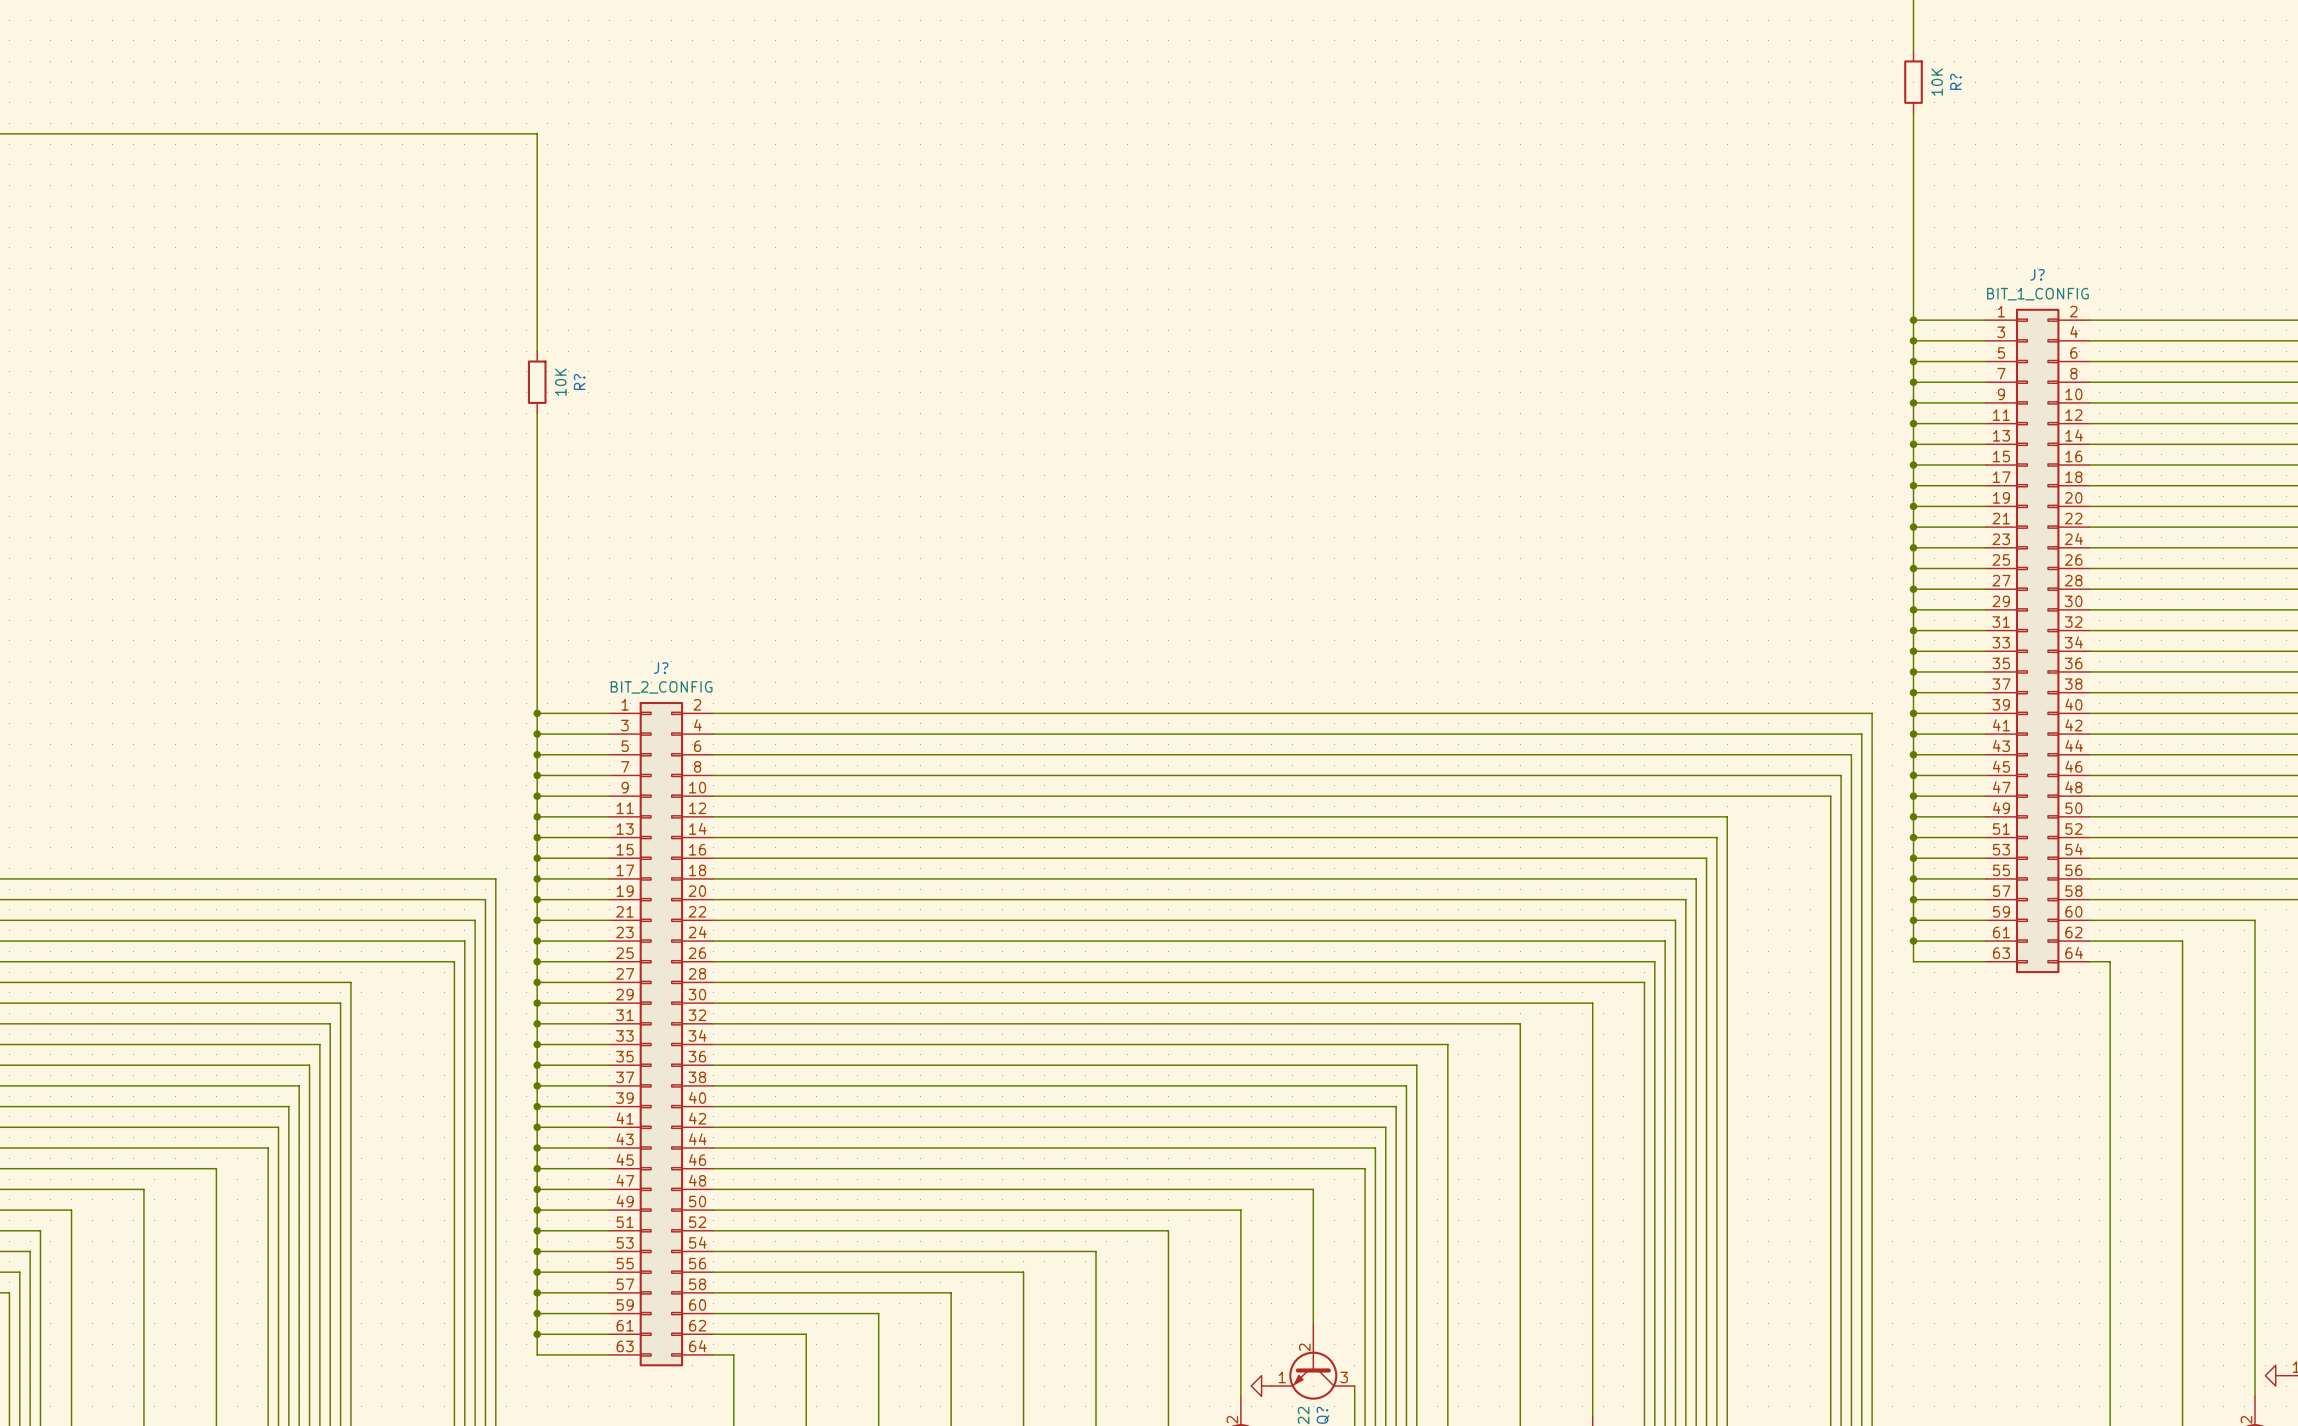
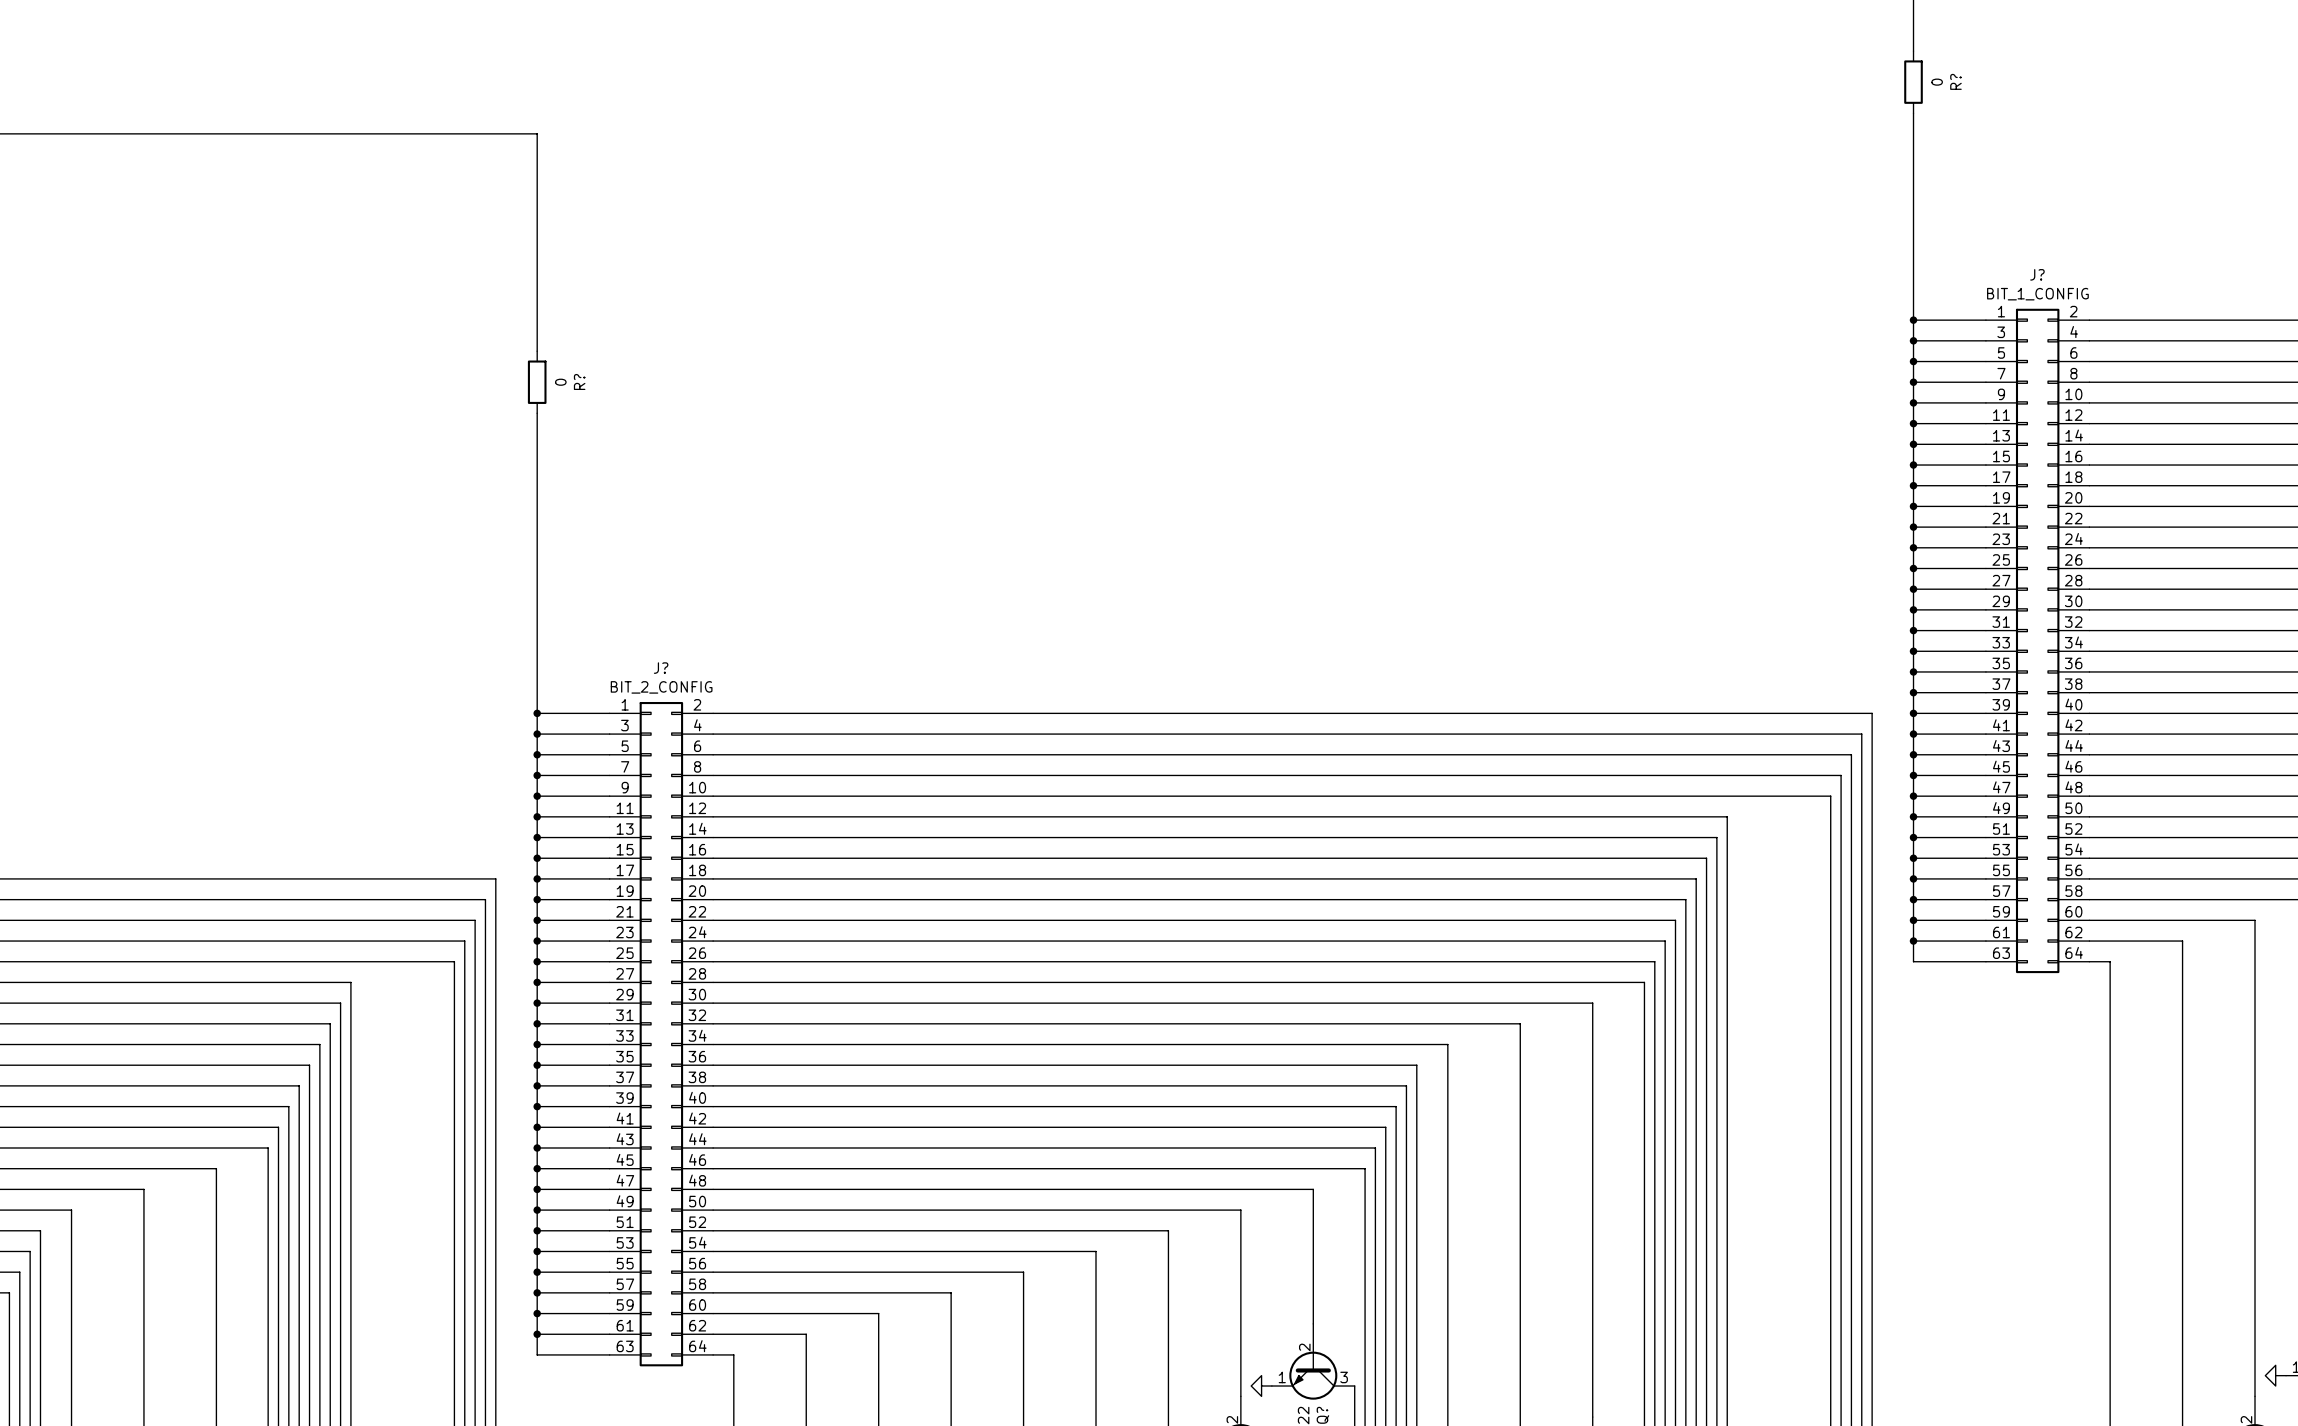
R? value: 10K (1937, 82) -> 0 (1937, 82)
R? value: 10K (560, 382) -> 0 (560, 382)

